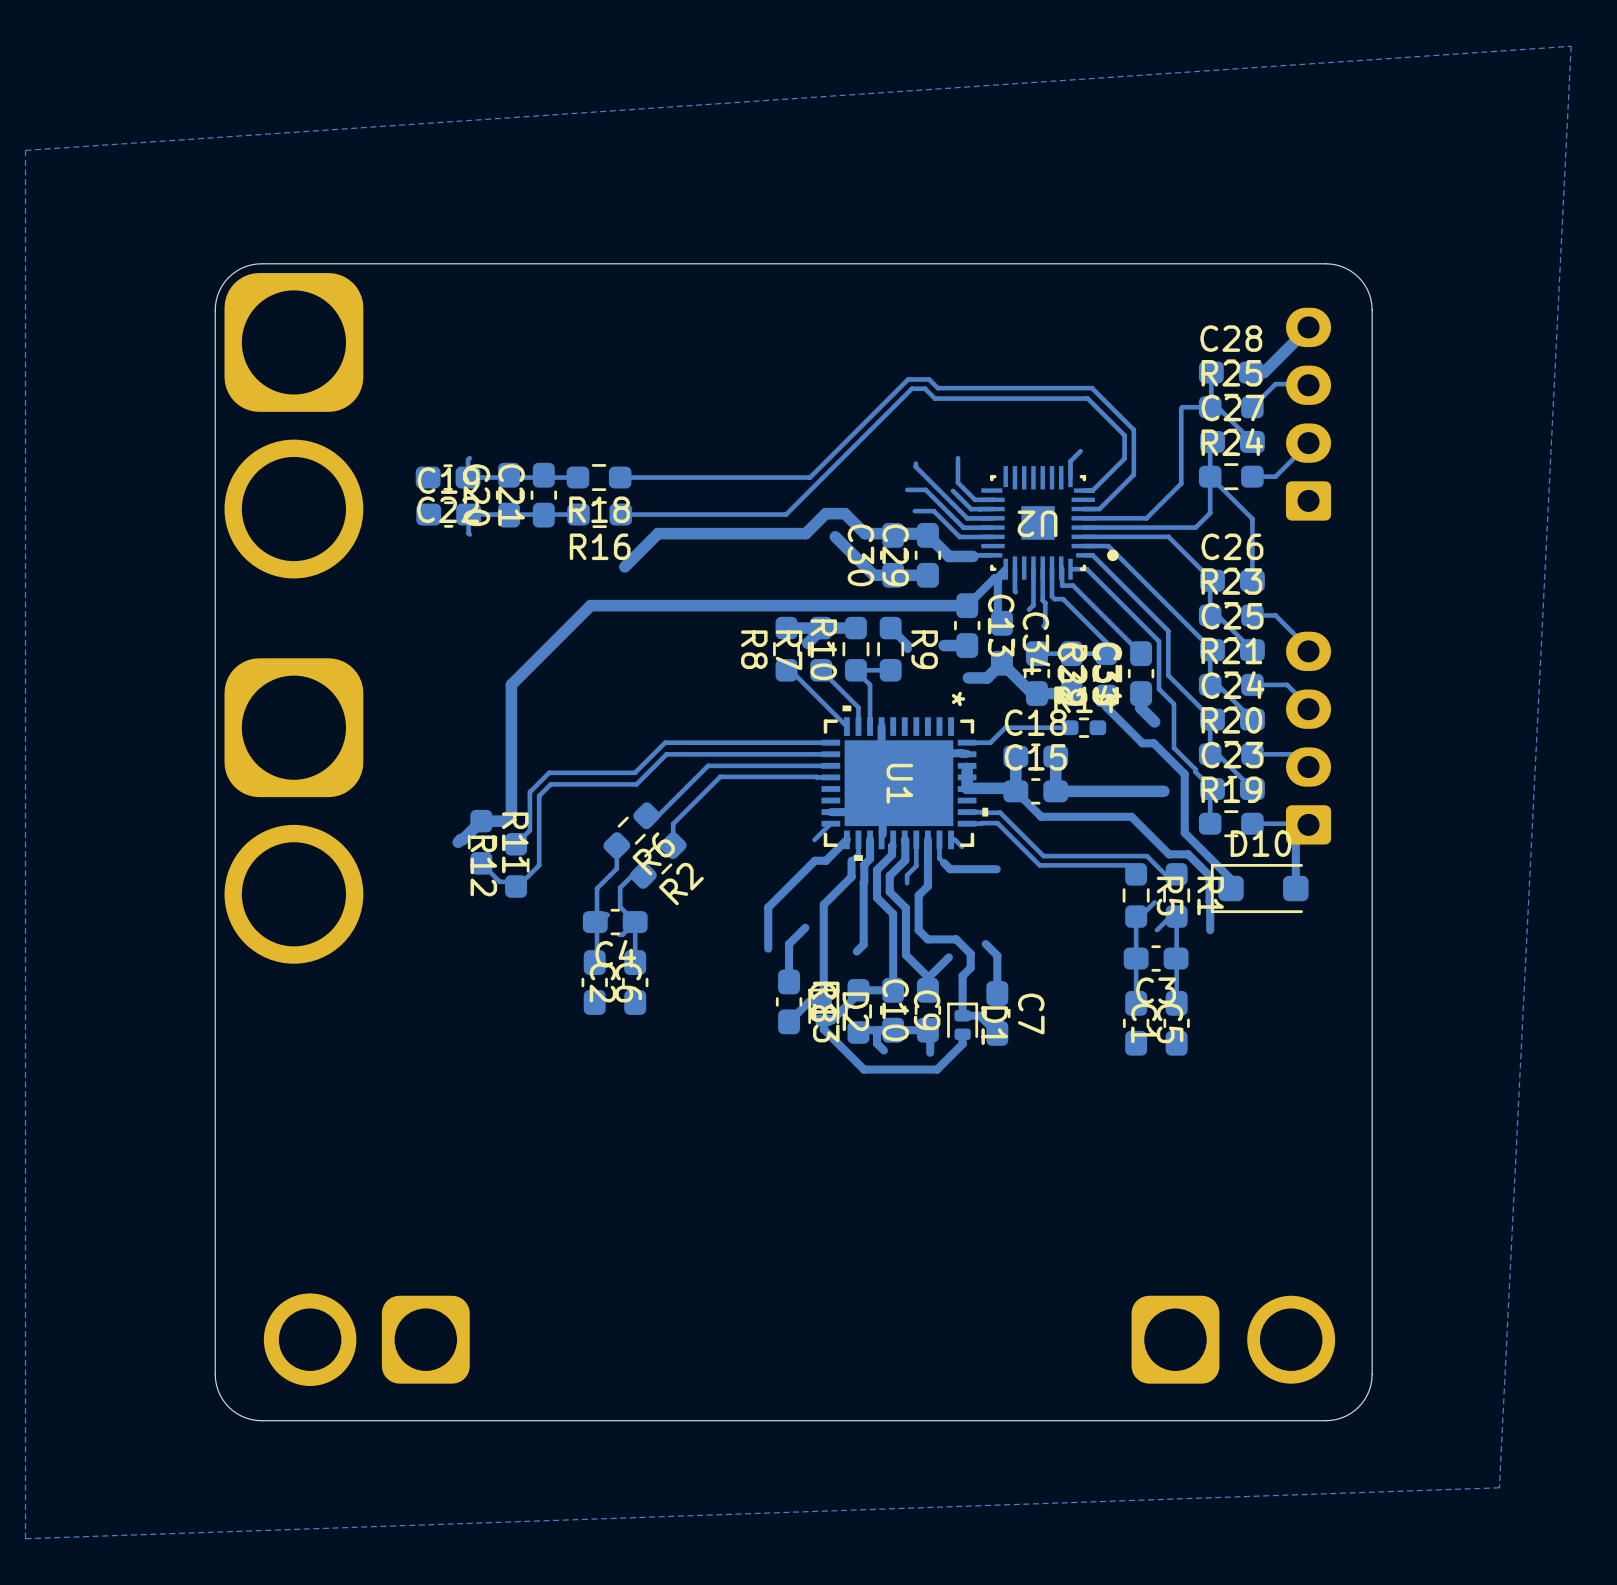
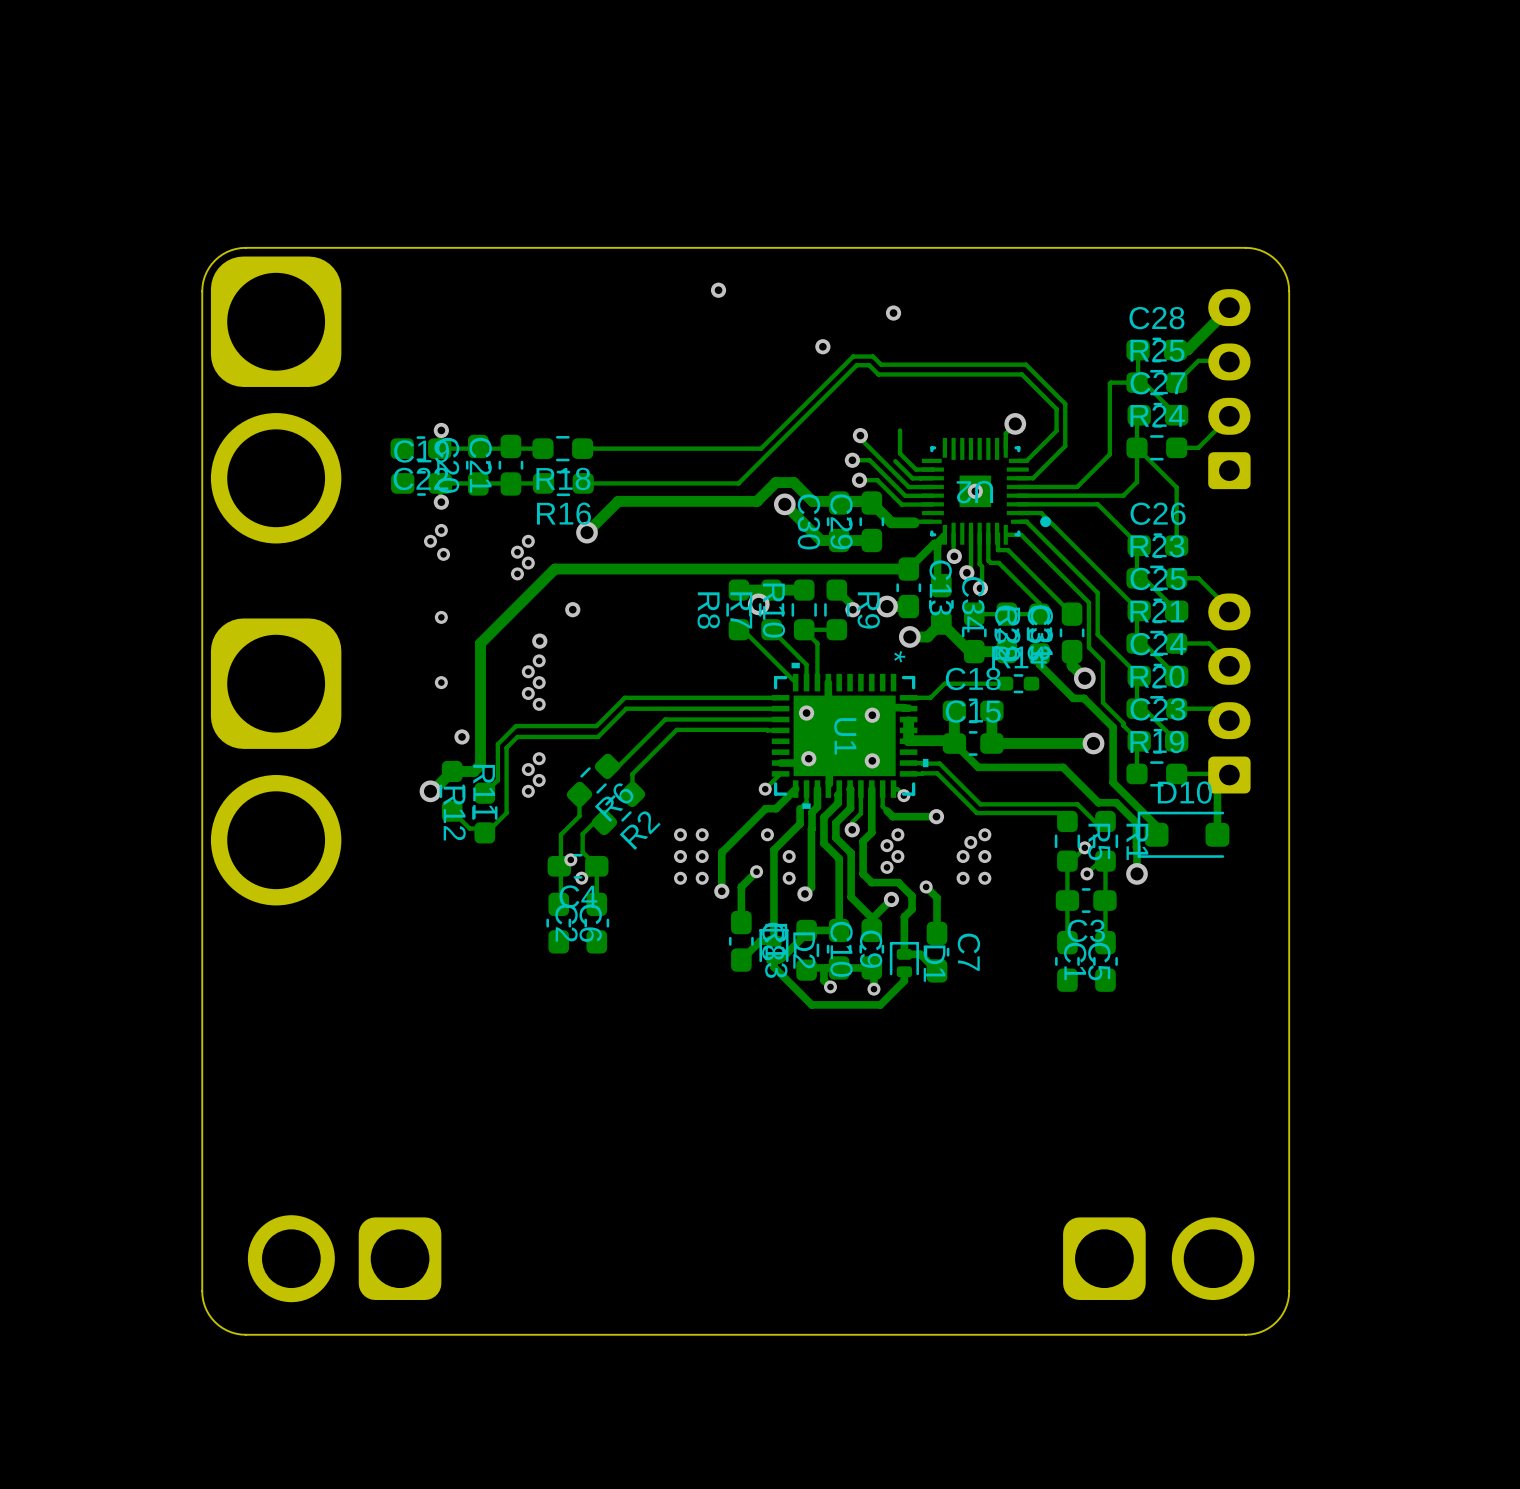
zone outline: (1571, 46) (1499, 1487) (25, 1538) (25, 150) (1571, 46) -> none
via: none -> (718, 290)
via: none -> (893, 313)
via: none -> (822, 346)
via: none -> (1015, 423)
via: none -> (441, 430)
via: none -> (860, 435)
via: none -> (852, 460)
via: none -> (859, 480)
via: none -> (975, 491)
via: none -> (441, 502)
via: none -> (784, 504)
via: none -> (441, 530)
via: none -> (587, 532)
via: none -> (430, 541)
via: none -> (528, 541)
via: none -> (517, 552)
via: none -> (443, 554)
via: none -> (954, 556)
via: none -> (528, 563)
via: none -> (966, 572)
via: none -> (517, 573)
via: none -> (980, 588)
via: none -> (758, 604)
via: none -> (887, 606)
via: none -> (572, 609)
via: none -> (852, 609)
via: none -> (441, 617)
via: none -> (909, 636)
via: none -> (539, 641)
via: none -> (539, 660)
via: none -> (528, 671)
via: none -> (1084, 678)
via: none -> (441, 682)
via: none -> (539, 682)
via: none -> (528, 693)
via: none -> (539, 704)
via: none -> (806, 713)
via: none -> (872, 715)
via: none -> (462, 736)
via: none -> (1093, 743)
via: none -> (539, 758)
via: none -> (808, 758)
via: none -> (872, 760)
via: none -> (528, 769)
via: none -> (539, 780)
via: none -> (765, 789)
via: none -> (430, 791)
via: none -> (528, 791)
via: none -> (903, 795)
via: none -> (936, 816)
via: none -> (852, 829)
via: none -> (680, 834)
via: none -> (702, 834)
via: none -> (767, 834)
via: none -> (897, 834)
via: none -> (984, 834)
via: none -> (970, 842)
via: none -> (887, 845)
via: none -> (1084, 847)
via: none -> (680, 856)
via: none -> (702, 856)
via: none -> (789, 856)
via: none -> (897, 856)
via: none -> (963, 856)
via: none -> (984, 856)
via: none -> (570, 859)
via: none -> (887, 867)
via: none -> (756, 871)
via: none -> (1087, 873)
via: none -> (1137, 873)
via: none -> (581, 878)
via: none -> (680, 878)
via: none -> (702, 878)
via: none -> (789, 878)
via: none -> (963, 878)
via: none -> (984, 878)
via: none -> (926, 886)
via: none -> (721, 891)
via: none -> (804, 893)
via: none -> (891, 899)
via: none -> (830, 986)
via: none -> (873, 989)

